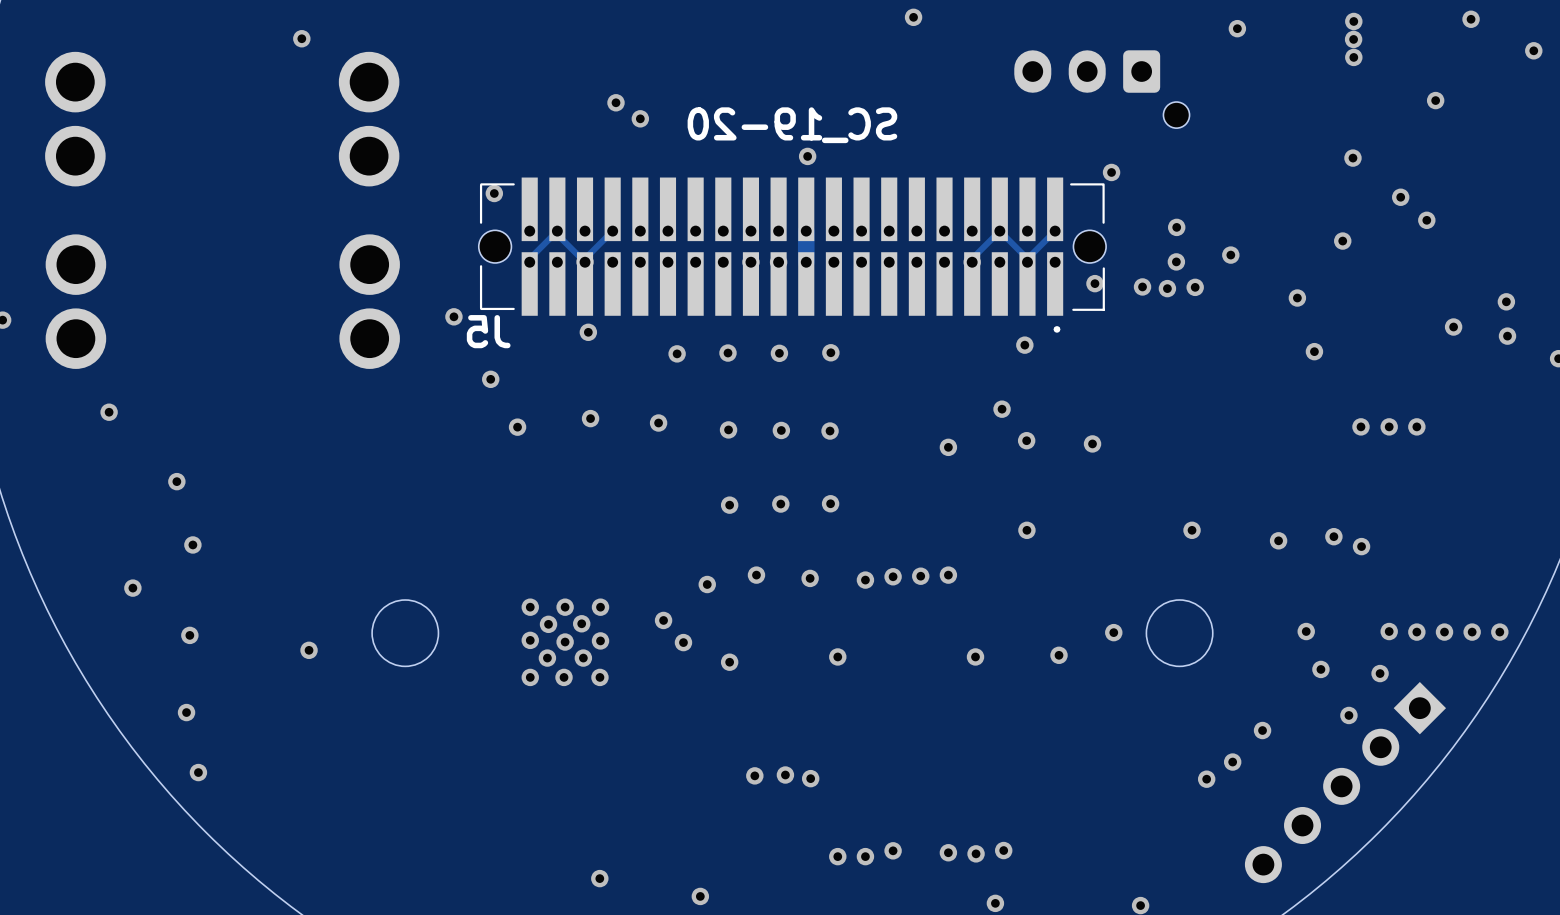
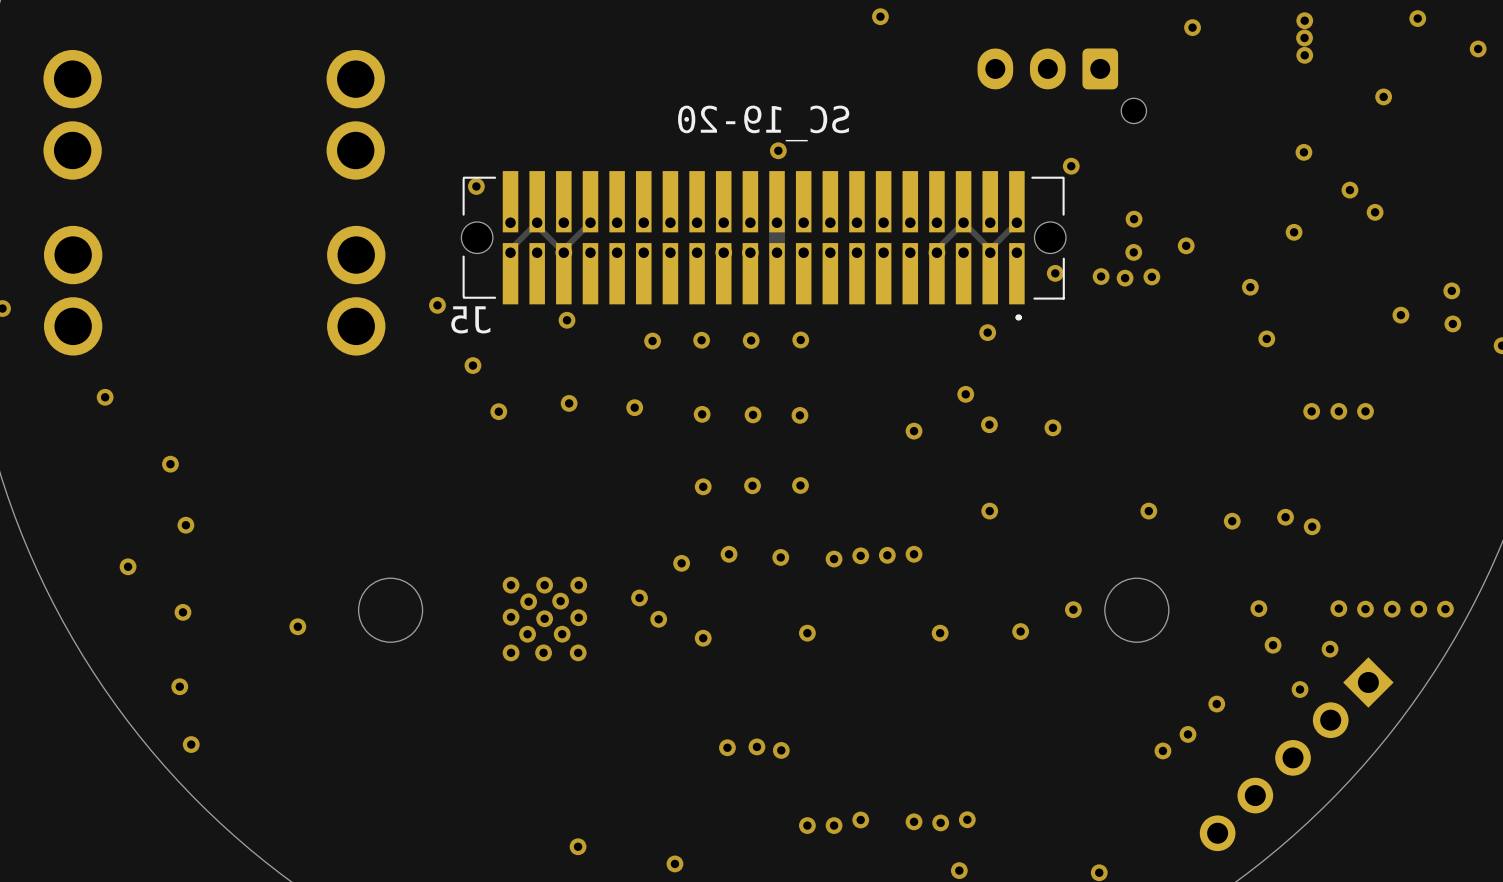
via: (301, 38) -> none
via: (616, 102) -> none
via: (640, 118) -> none

